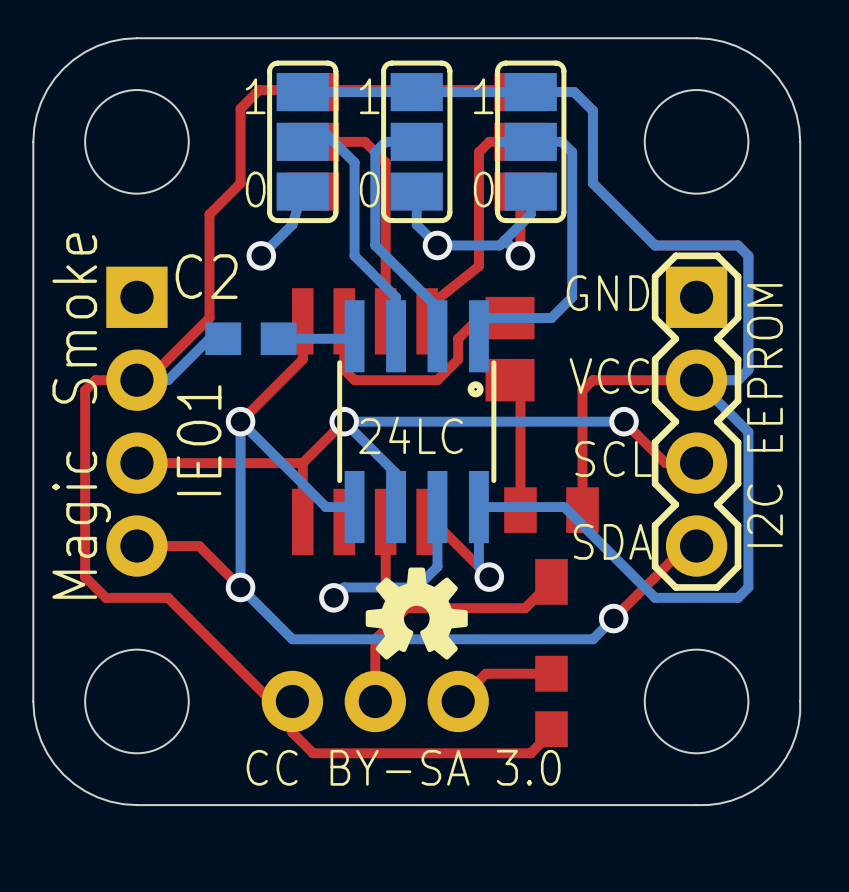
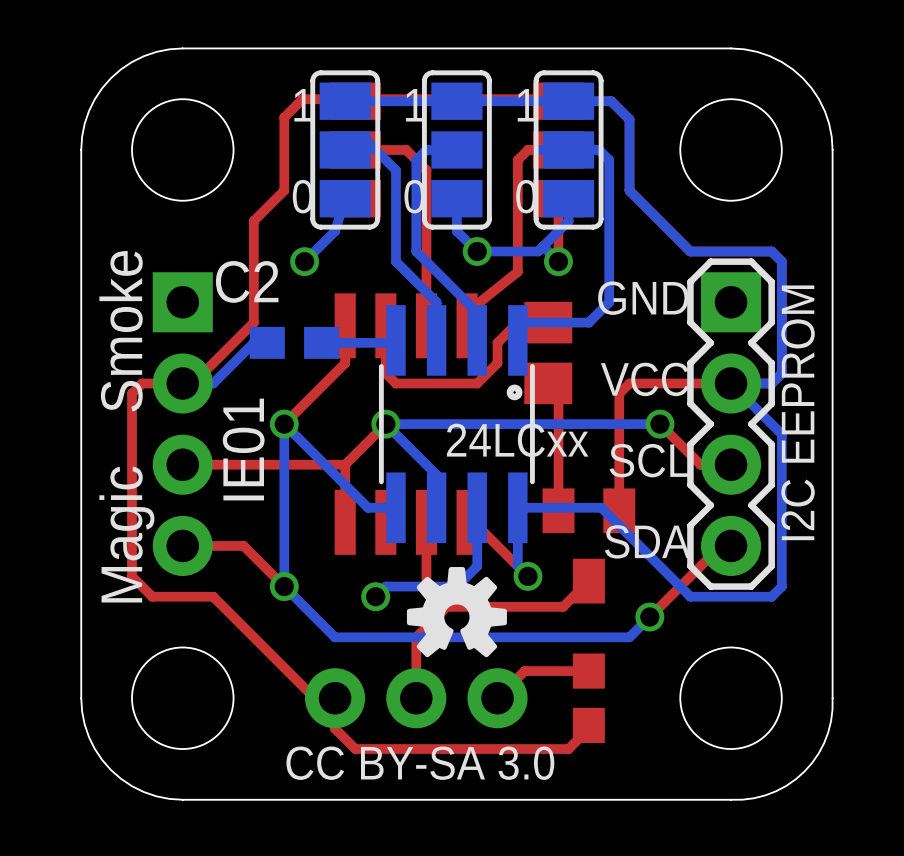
text: 24LC (411, 435) -> 24LCxx (517, 440)

